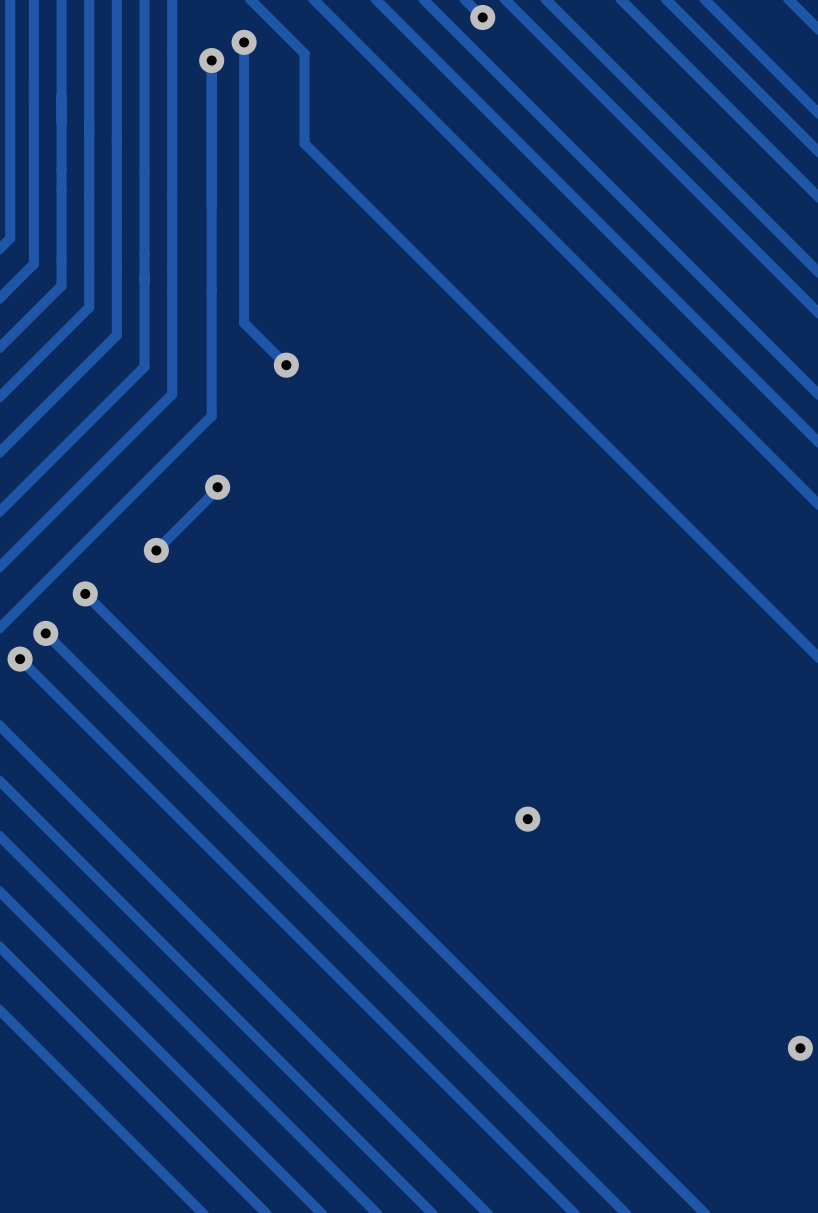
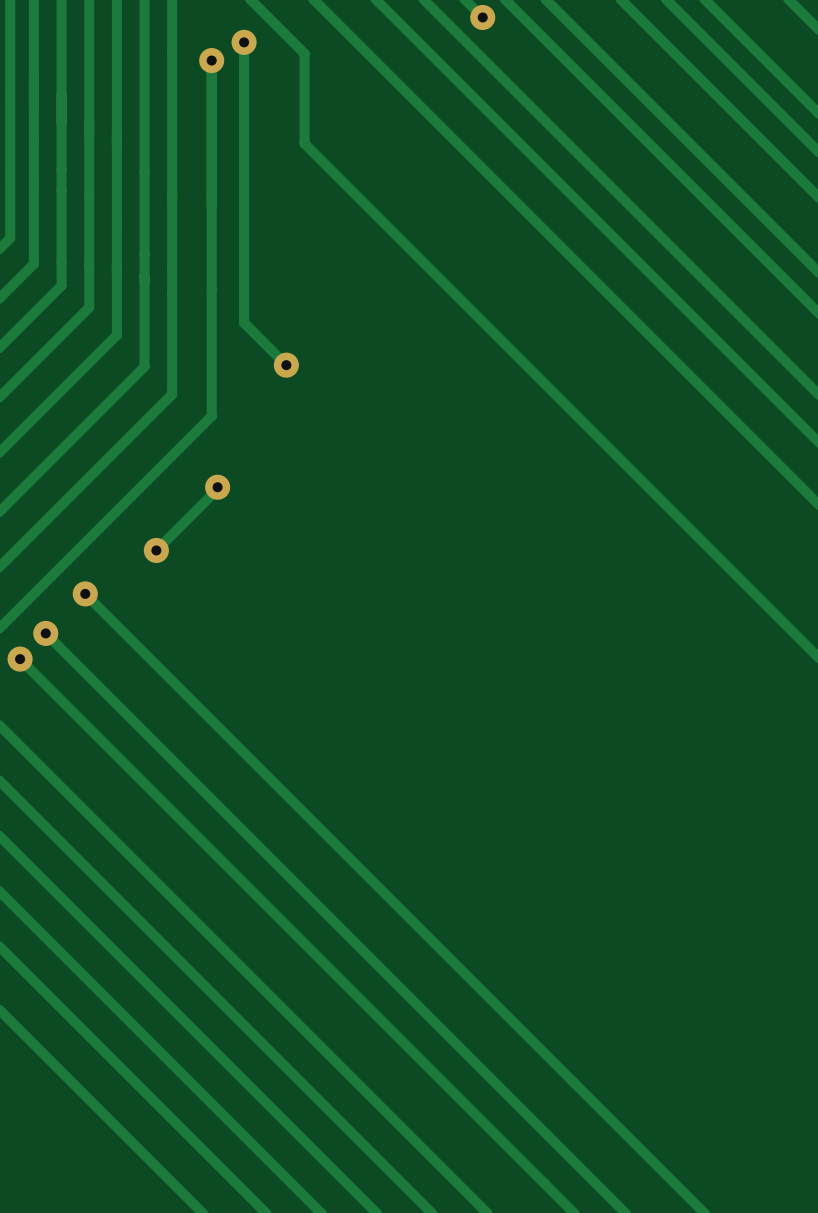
via: (527, 819) -> none
via: (800, 1048) -> none

